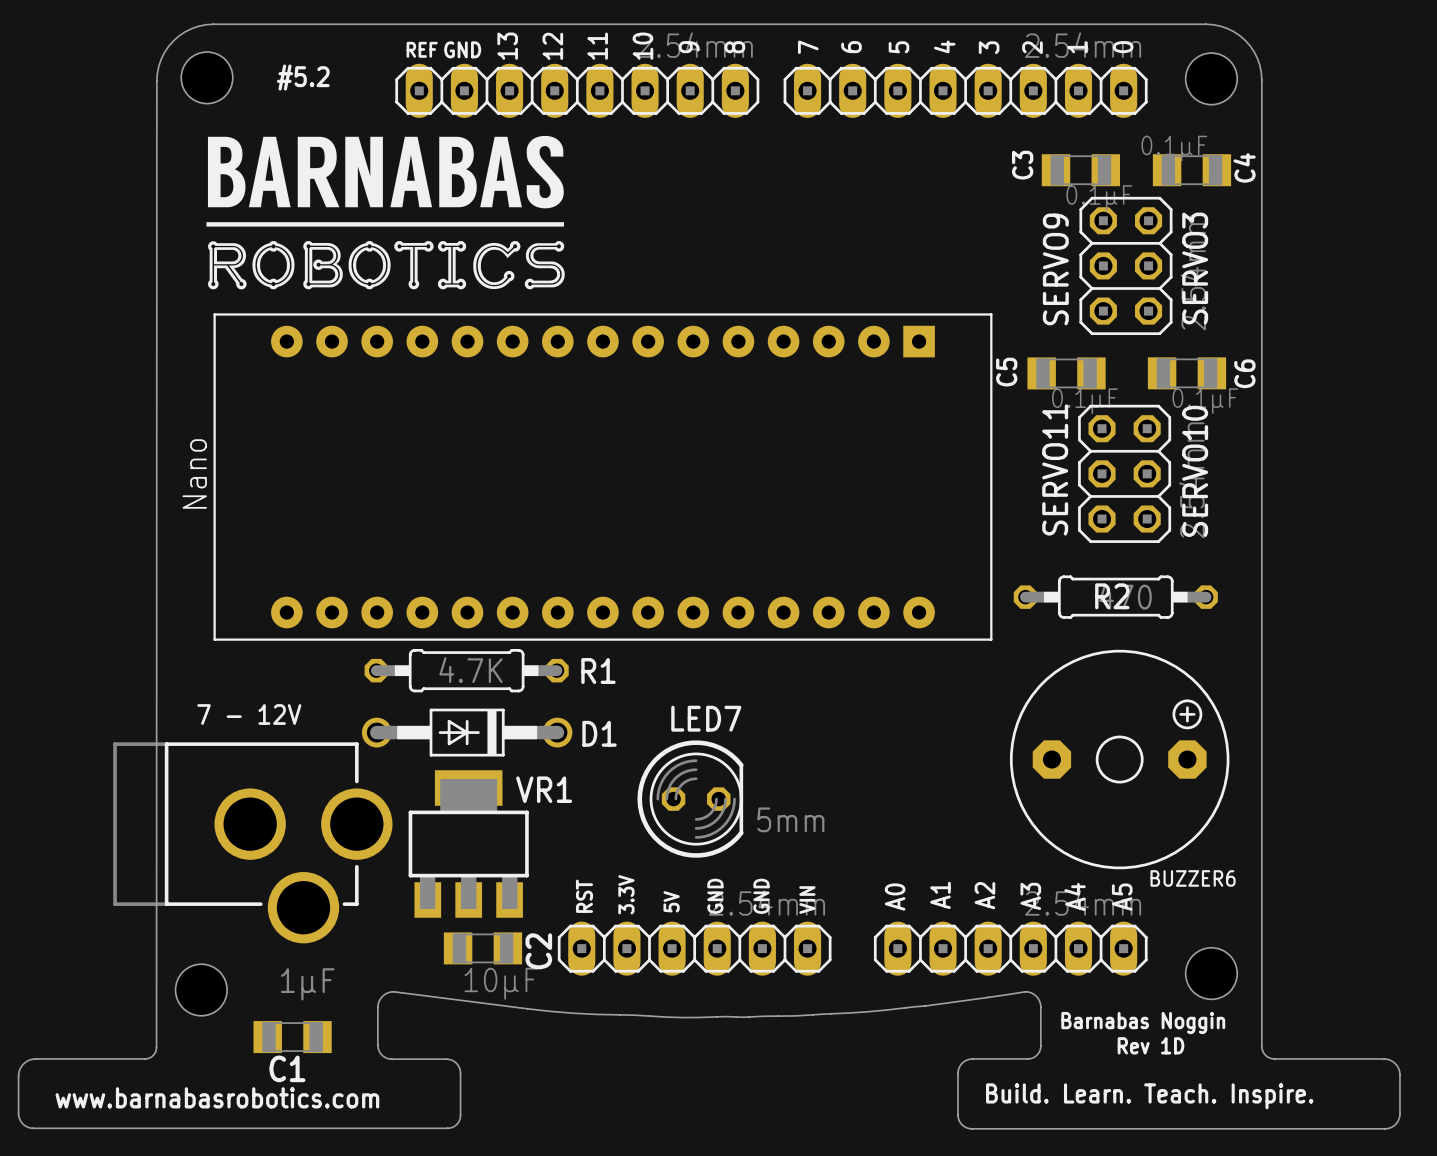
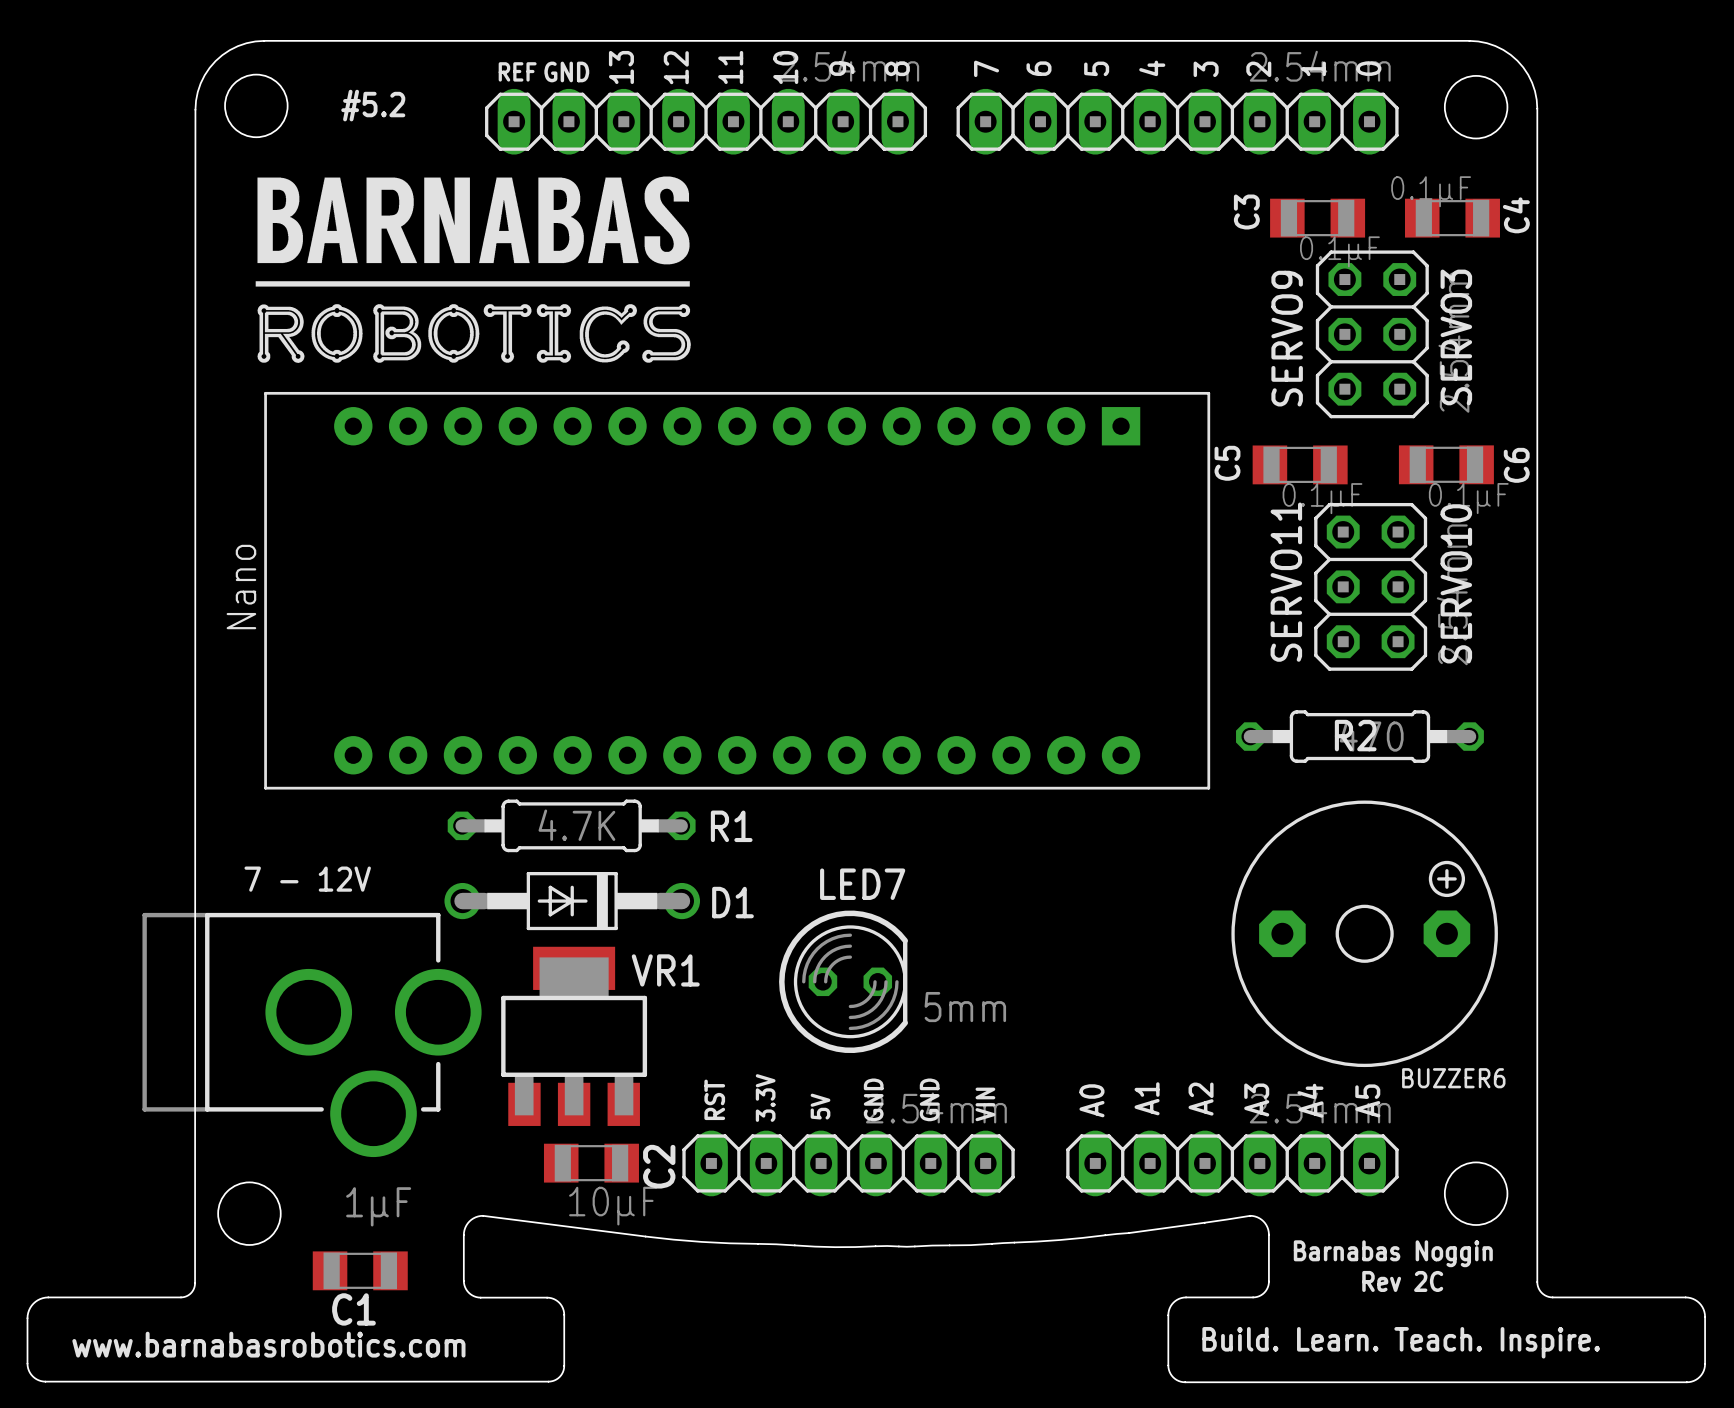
text: Rev 1D (1150, 1045) -> Rev 2C (1402, 1281)

